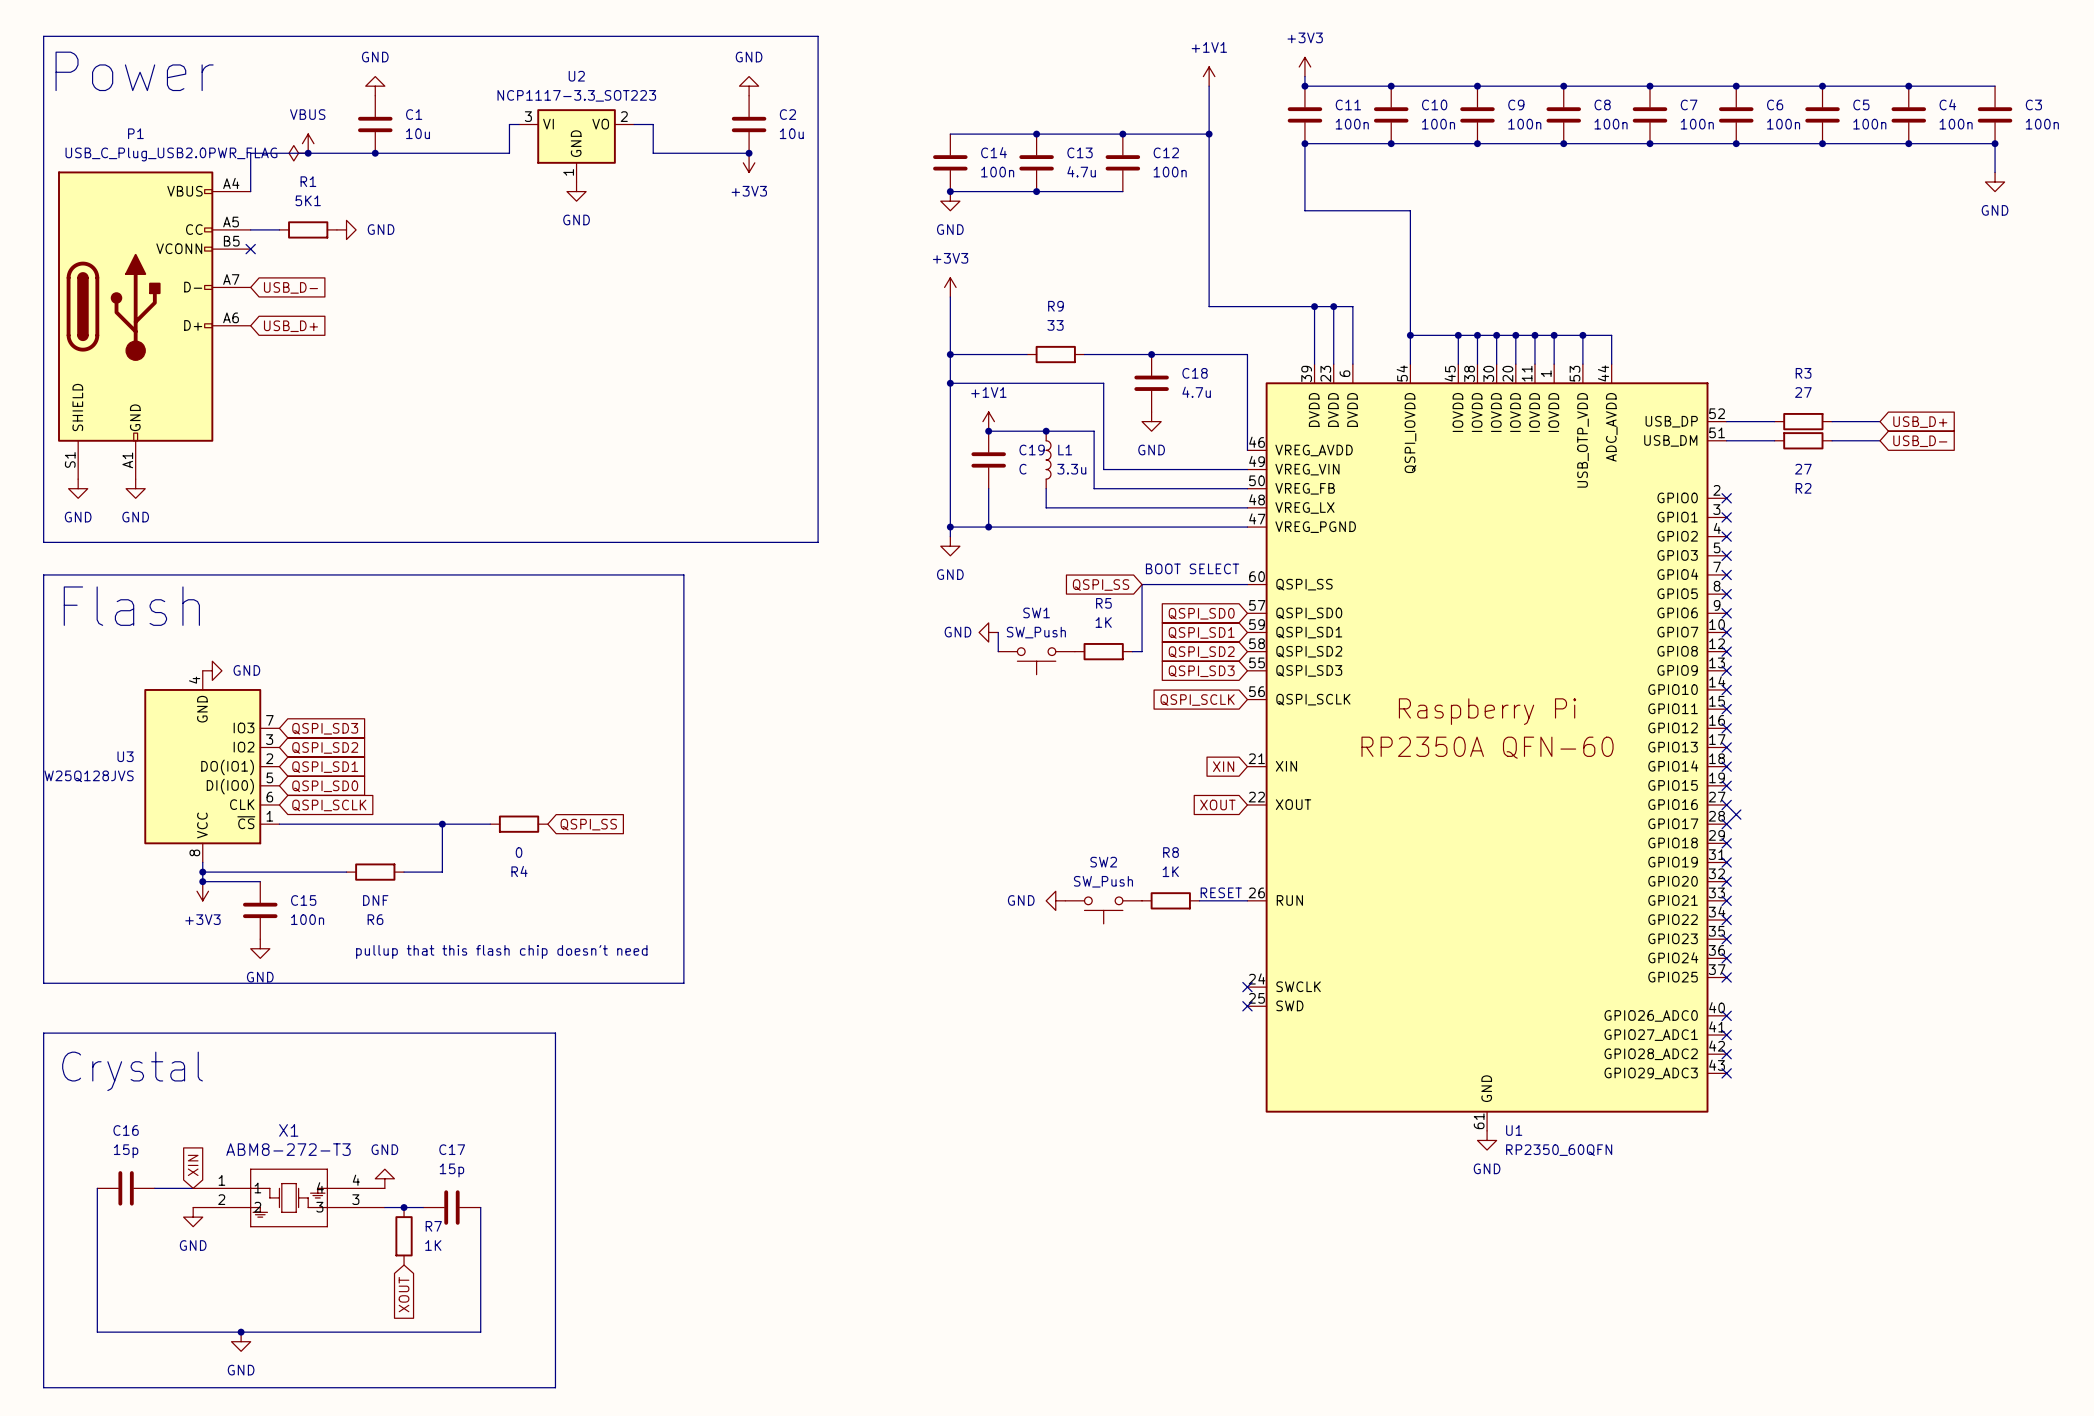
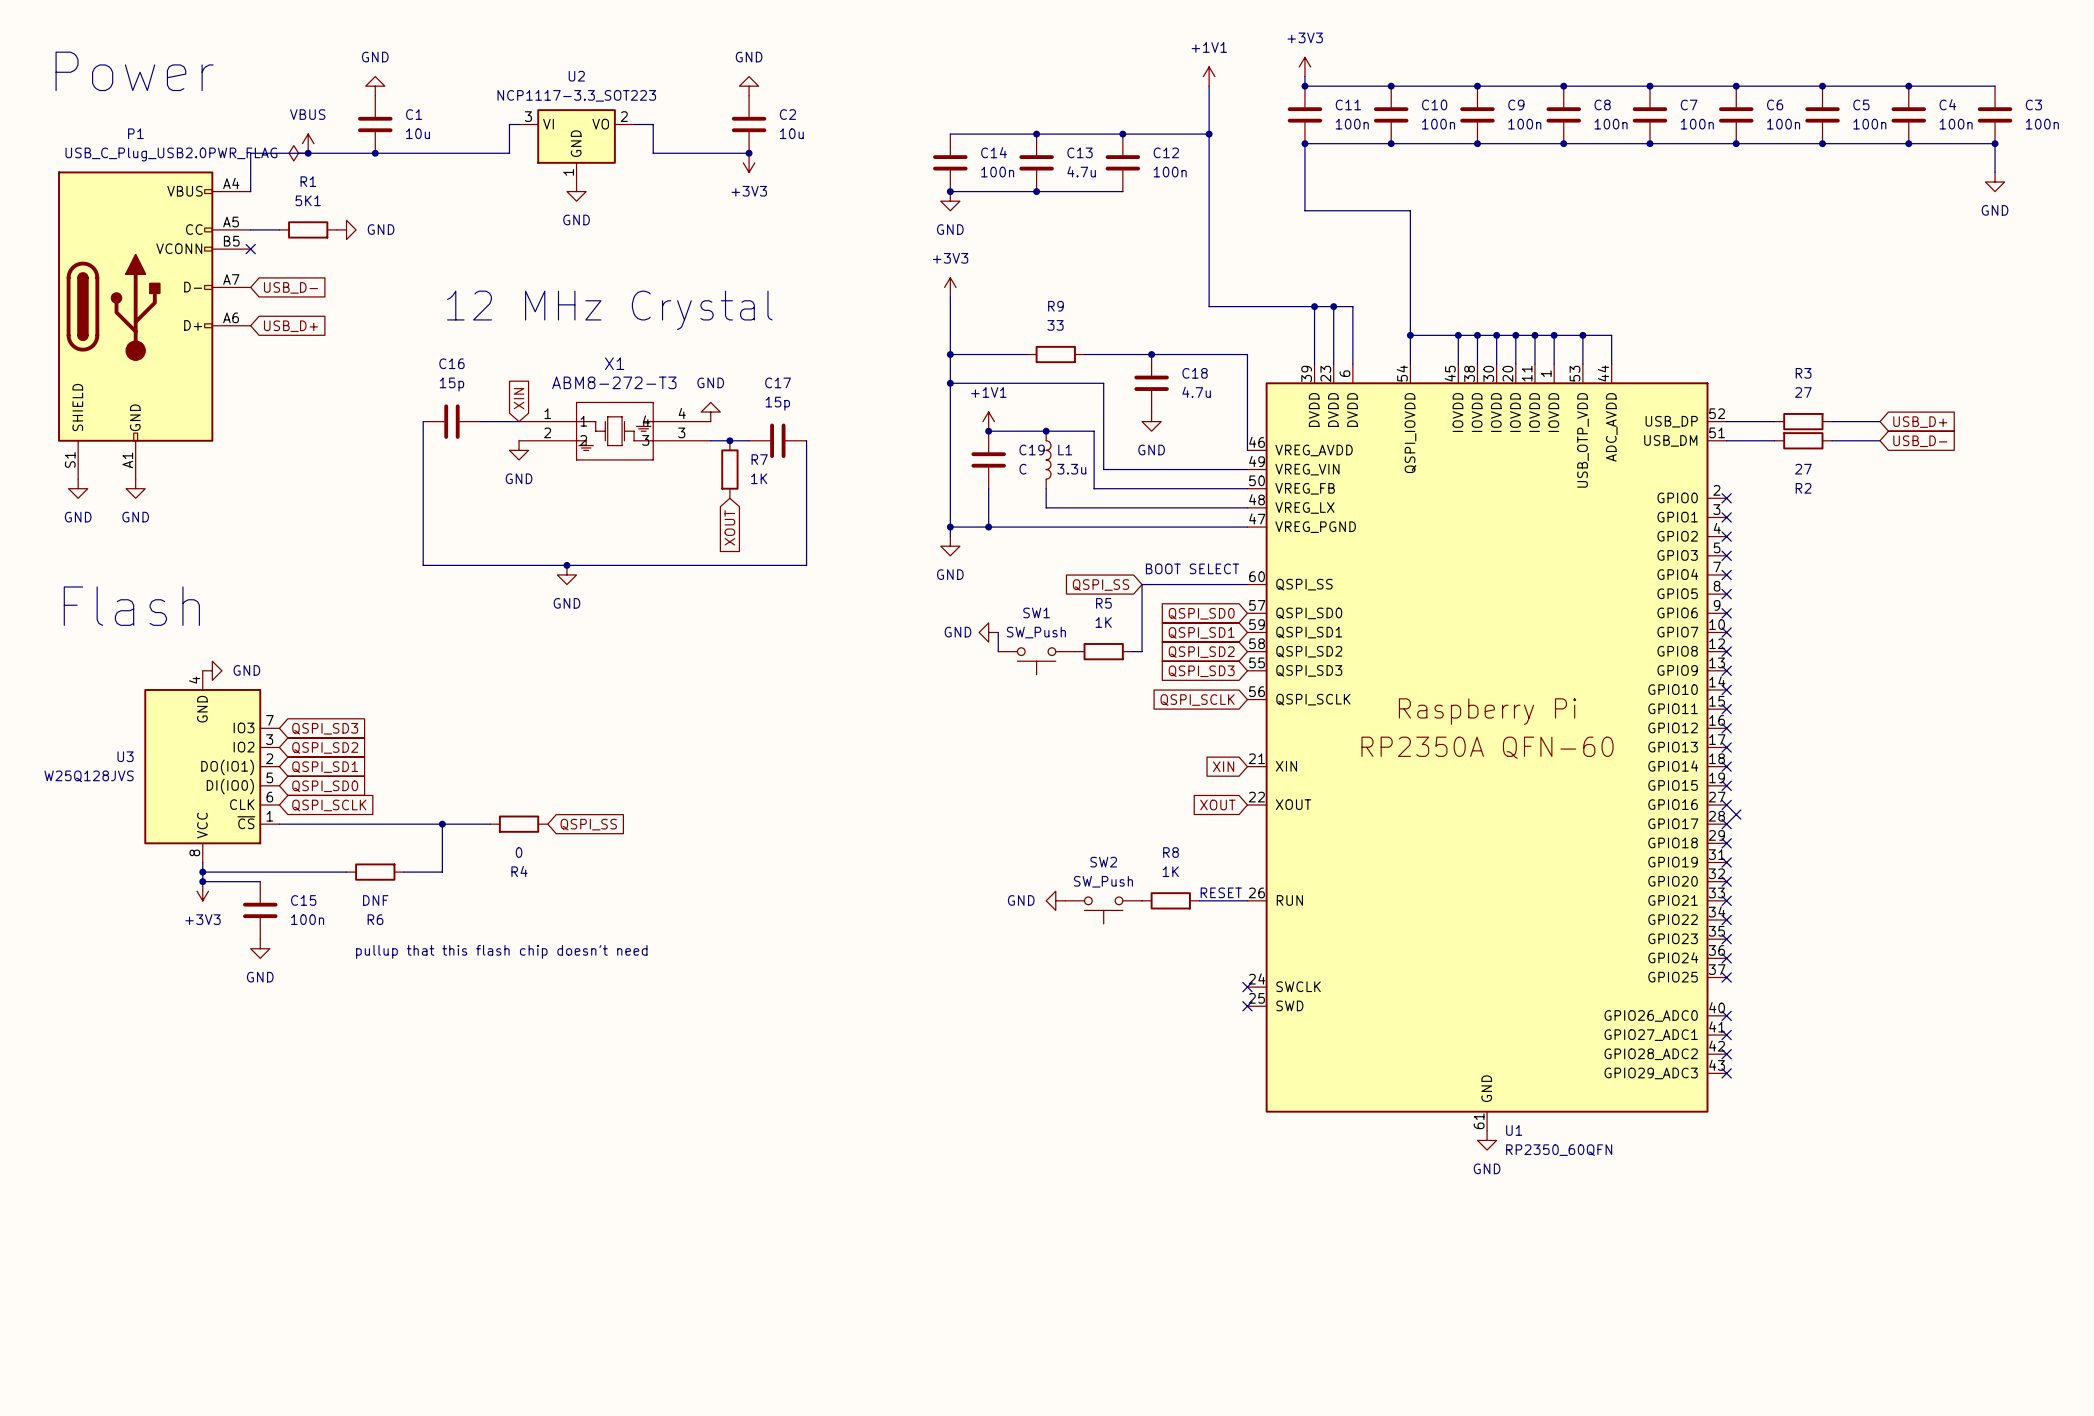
line: (43, 36) (818, 36) (818, 542) (43, 542) (43, 36) -> none
text: none -> 12 MHz Crystal (609, 310)
global label: none -> XIN (519, 398)
power symbol: none -> GND (710, 412)
wire: none -> (423, 421) (423, 565) (806, 565) (806, 440)
wire: none -> (480, 421) (519, 421)
wire: none -> (710, 440) (749, 440)
junction: none -> (729, 440)
power symbol: none -> GND (519, 450)
global label: none -> XOUT (729, 527)
junction: none -> (566, 565)
line: (43, 574) (43, 983) (683, 983) (683, 574) (43, 574) -> none
power symbol: none -> GND (566, 574)
line: (43, 1033) (43, 1387) (555, 1387) (555, 1033) (43, 1033) -> none
text: Crystal (132, 1071) -> none
global label: XIN (193, 1165) -> none
power symbol: GND (384, 1178) -> none
wire: (97, 1188) (97, 1332) (480, 1332) (480, 1207) -> none
C16 position: (126, 1188) -> (451, 421)
wire: (154, 1188) (193, 1188) -> none
X1 position: (289, 1197) -> (614, 431)
wire: (384, 1207) (423, 1207) -> none
junction: (404, 1207) -> none
C17 position: (451, 1207) -> (777, 440)
power symbol: GND (193, 1217) -> none
R7 position: (404, 1236) -> (729, 469)
global label: XOUT (404, 1294) -> none
junction: (241, 1332) -> none
power symbol: GND (241, 1341) -> none

